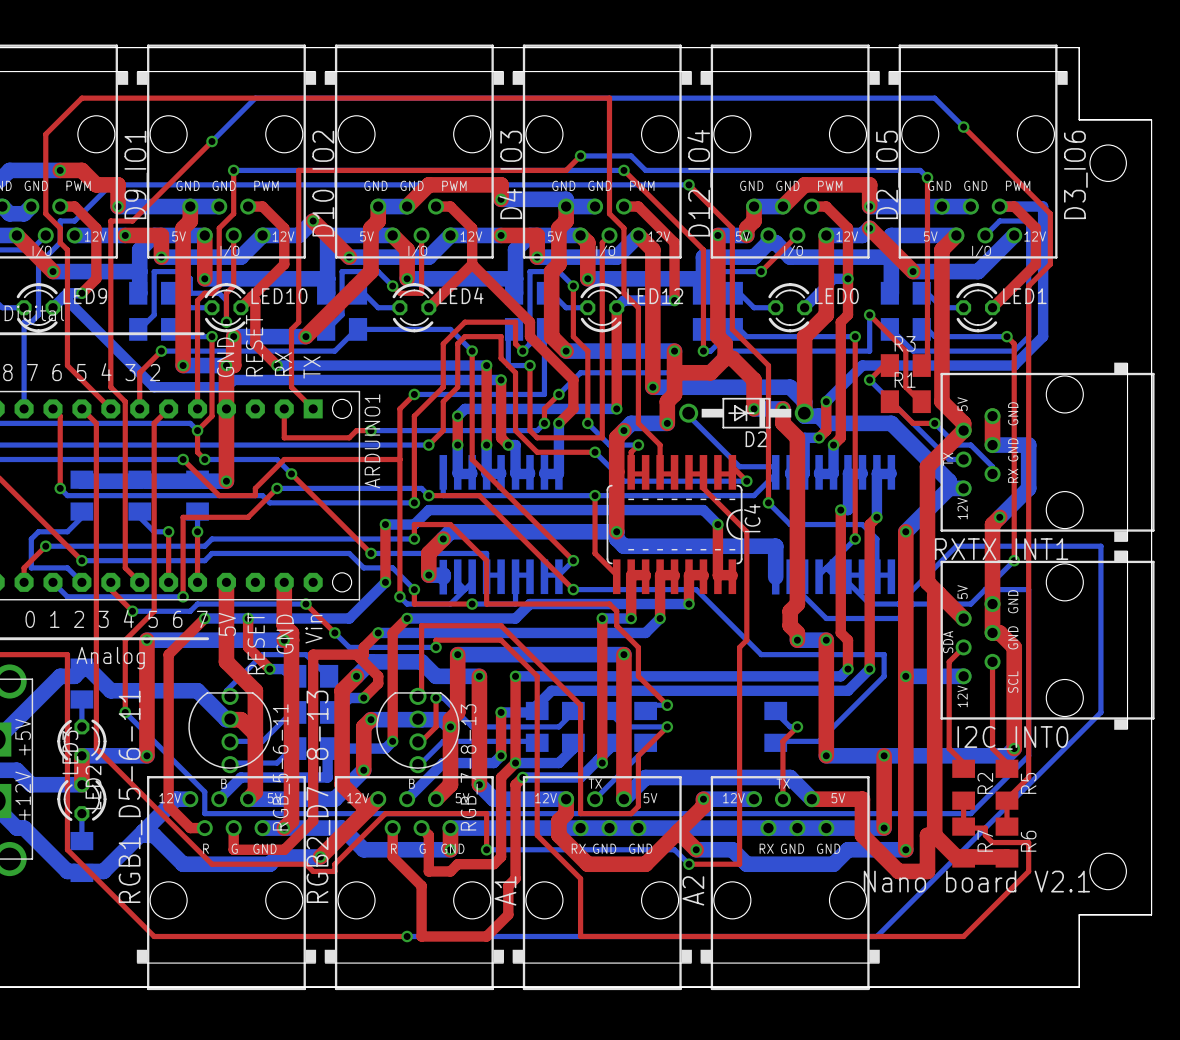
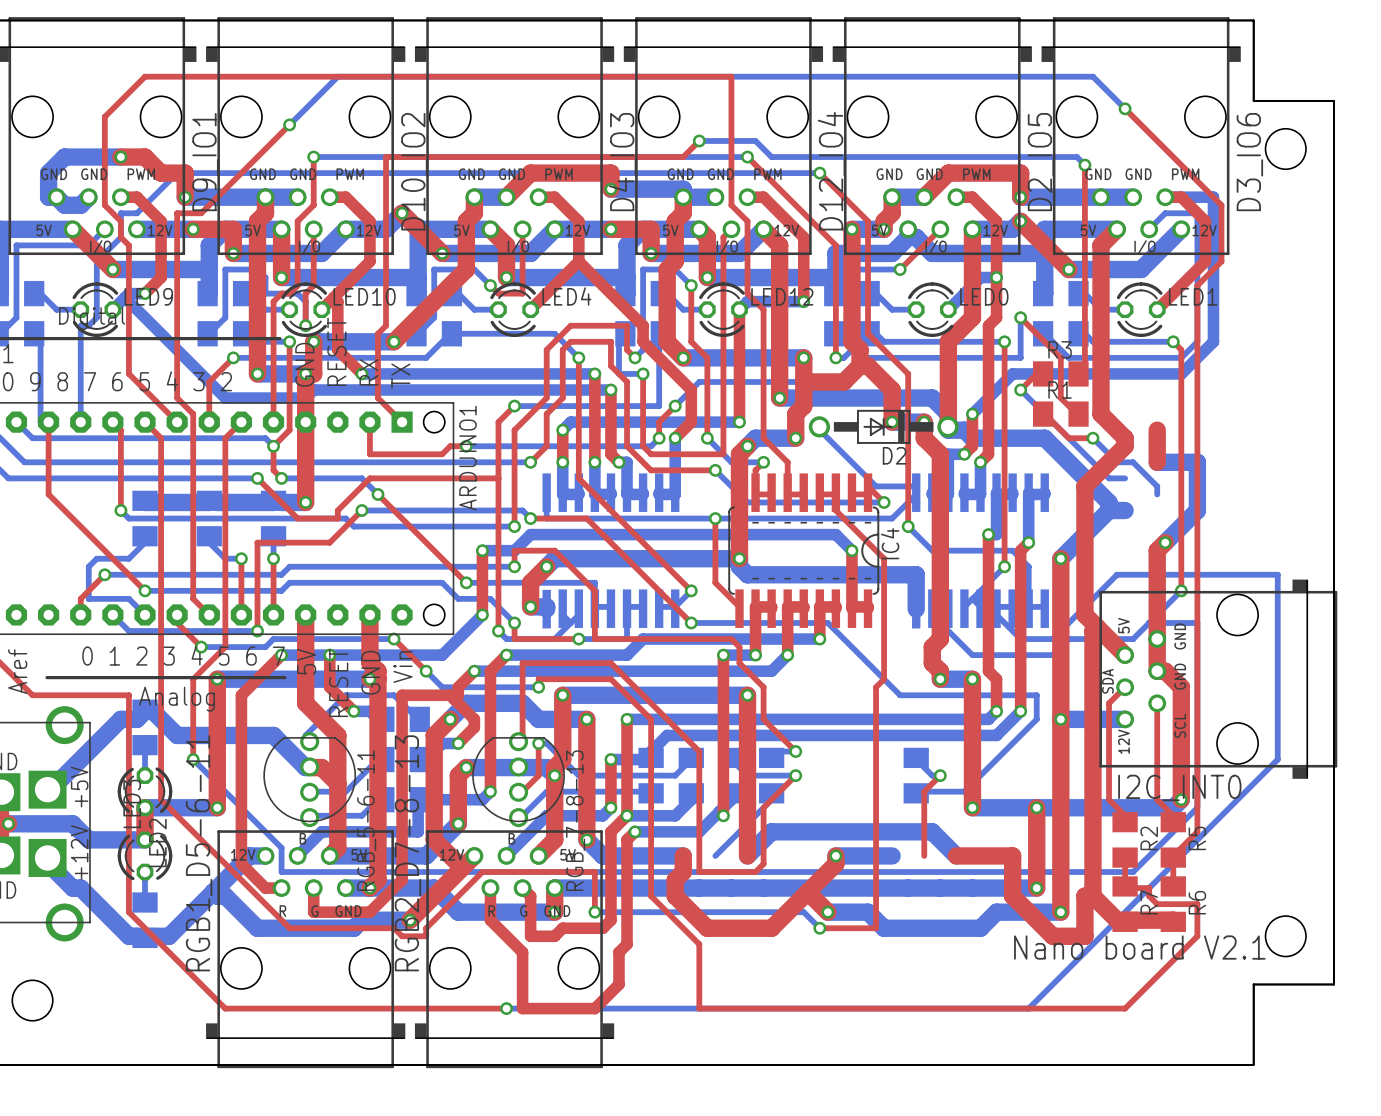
RXTX_INT1: (1047, 452) -> none
A1: (602, 883) -> none
A2: (790, 883) -> none

